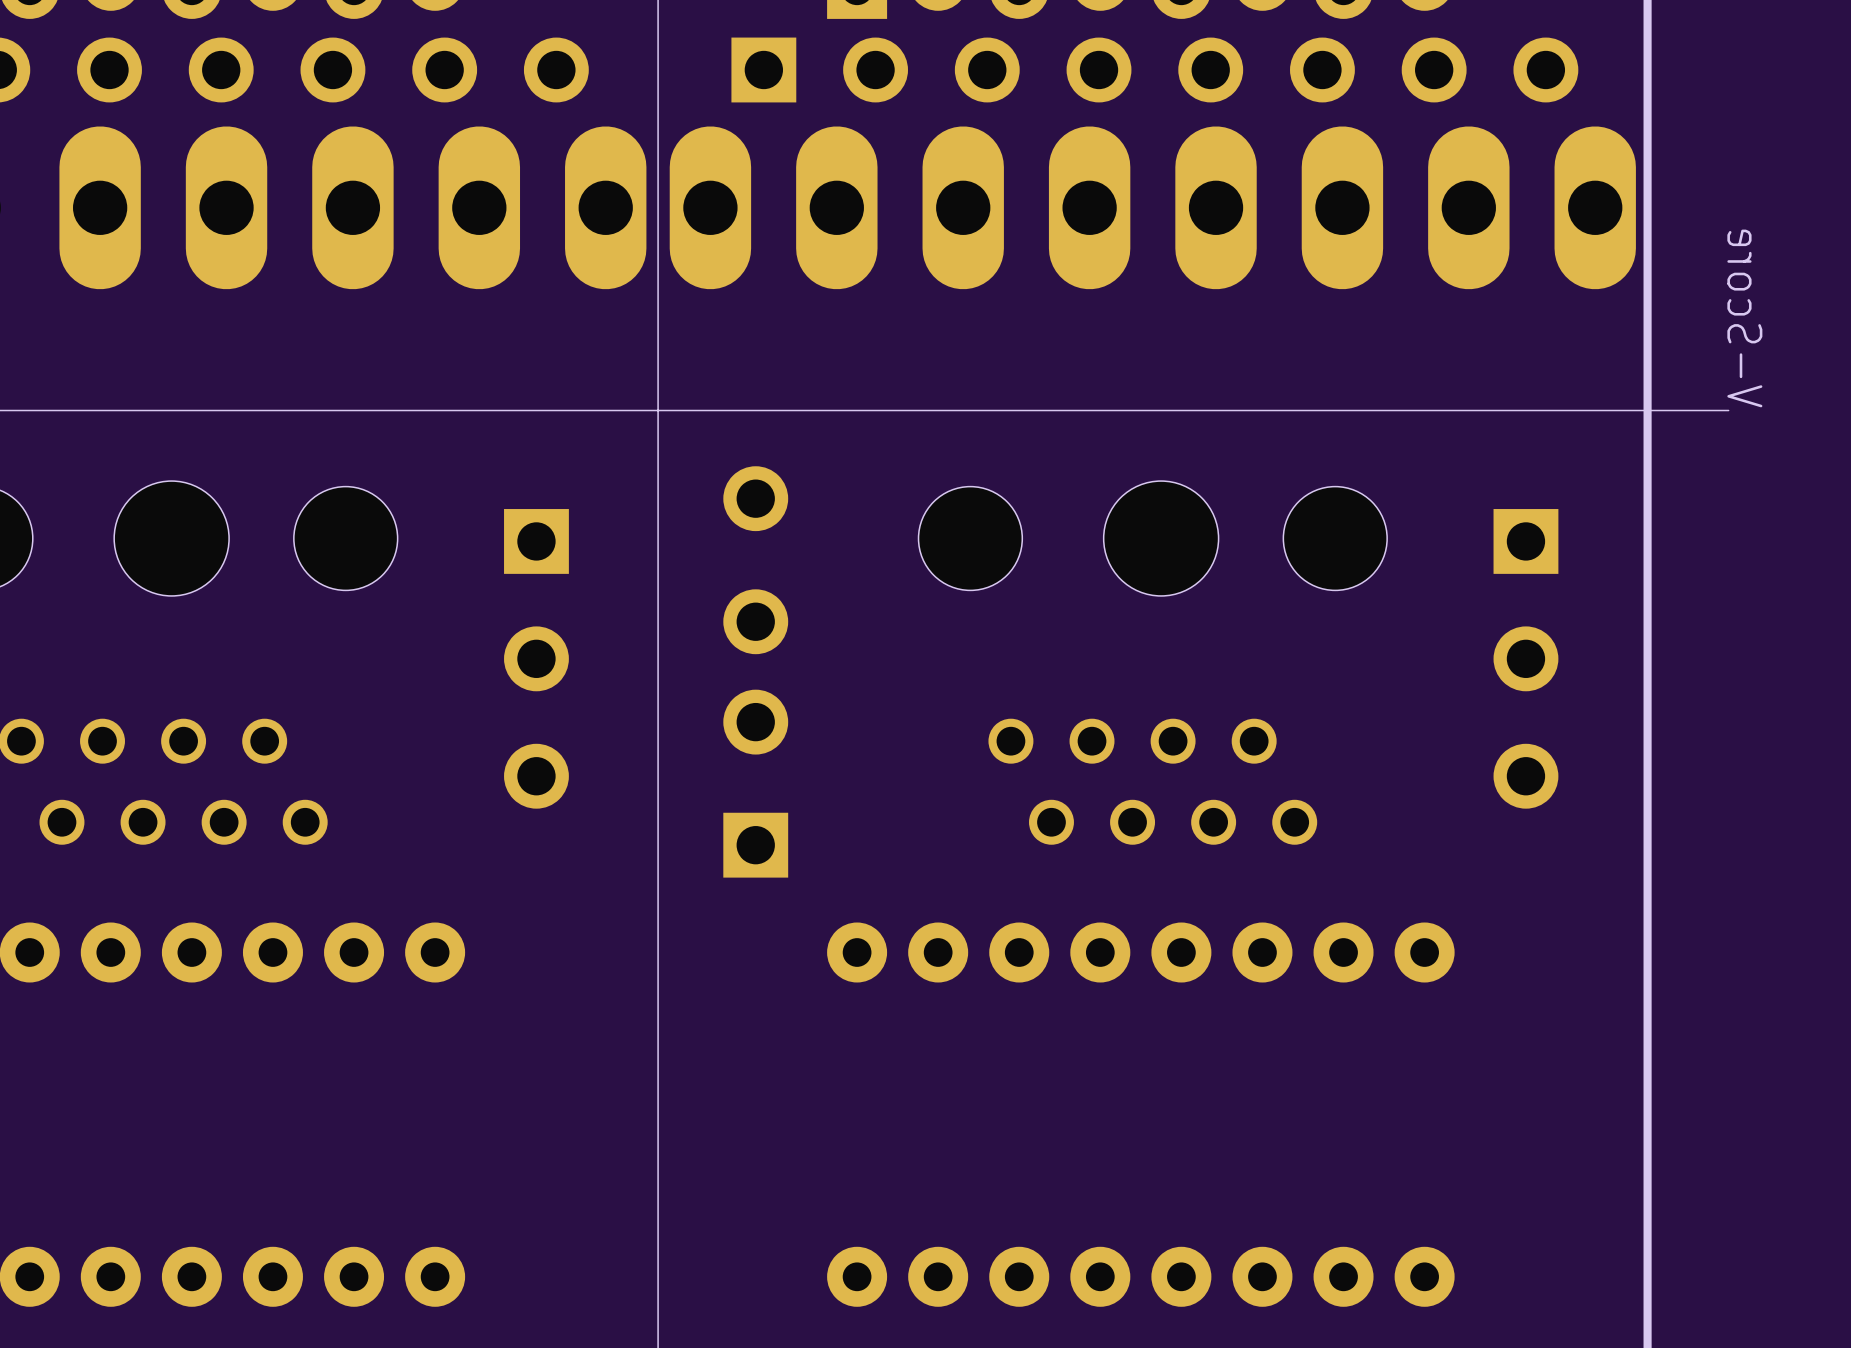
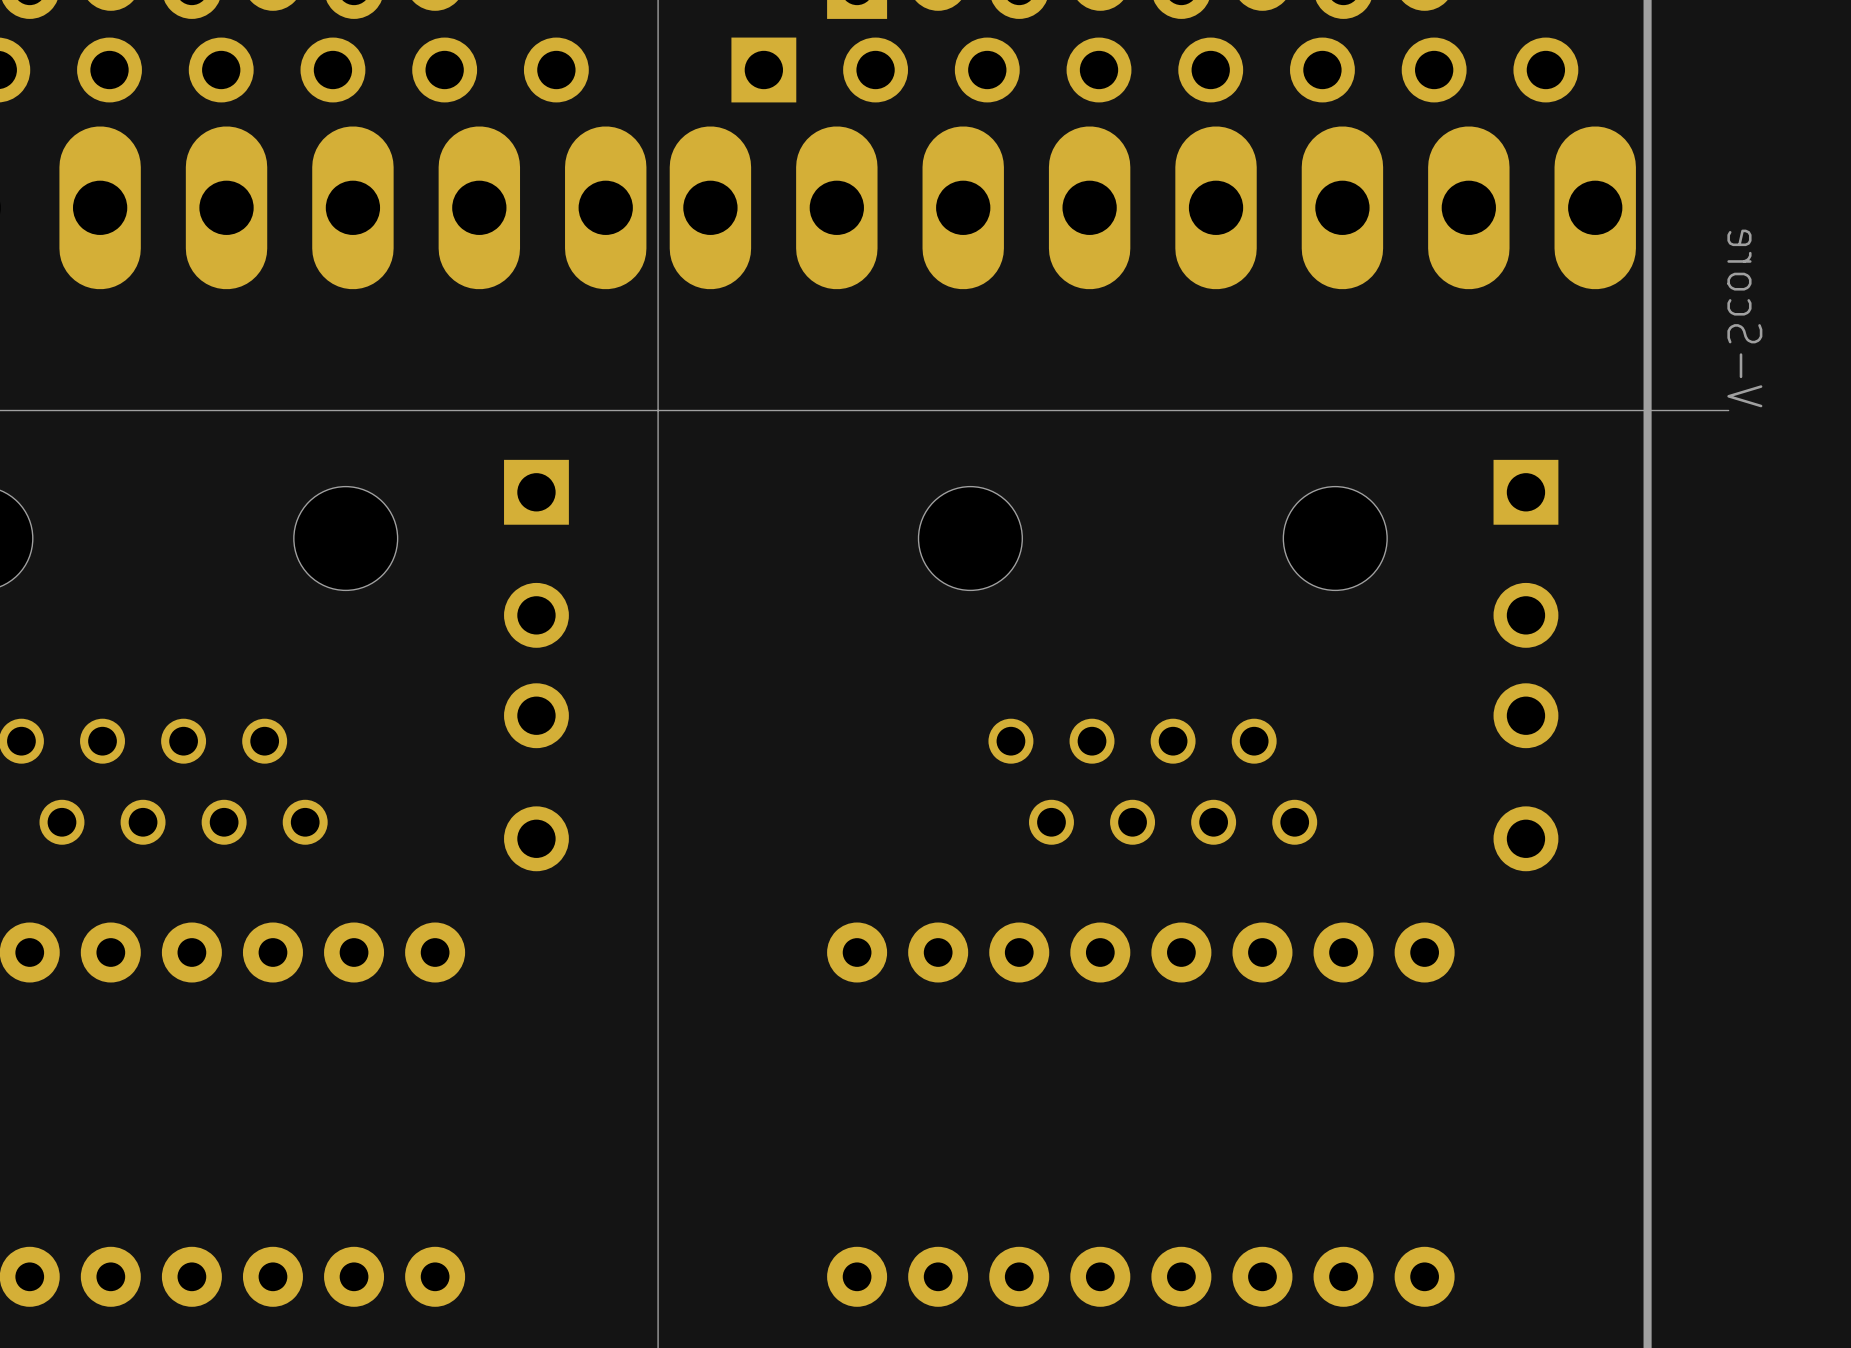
part footprint: [504, 509, 569, 809] -> [504, 459, 569, 872]
part footprint: [1493, 509, 1559, 809] -> [1493, 459, 1559, 872]
part: (171, 538) -> none
part: (1161, 538) -> none
part: (755, 671) -> none

